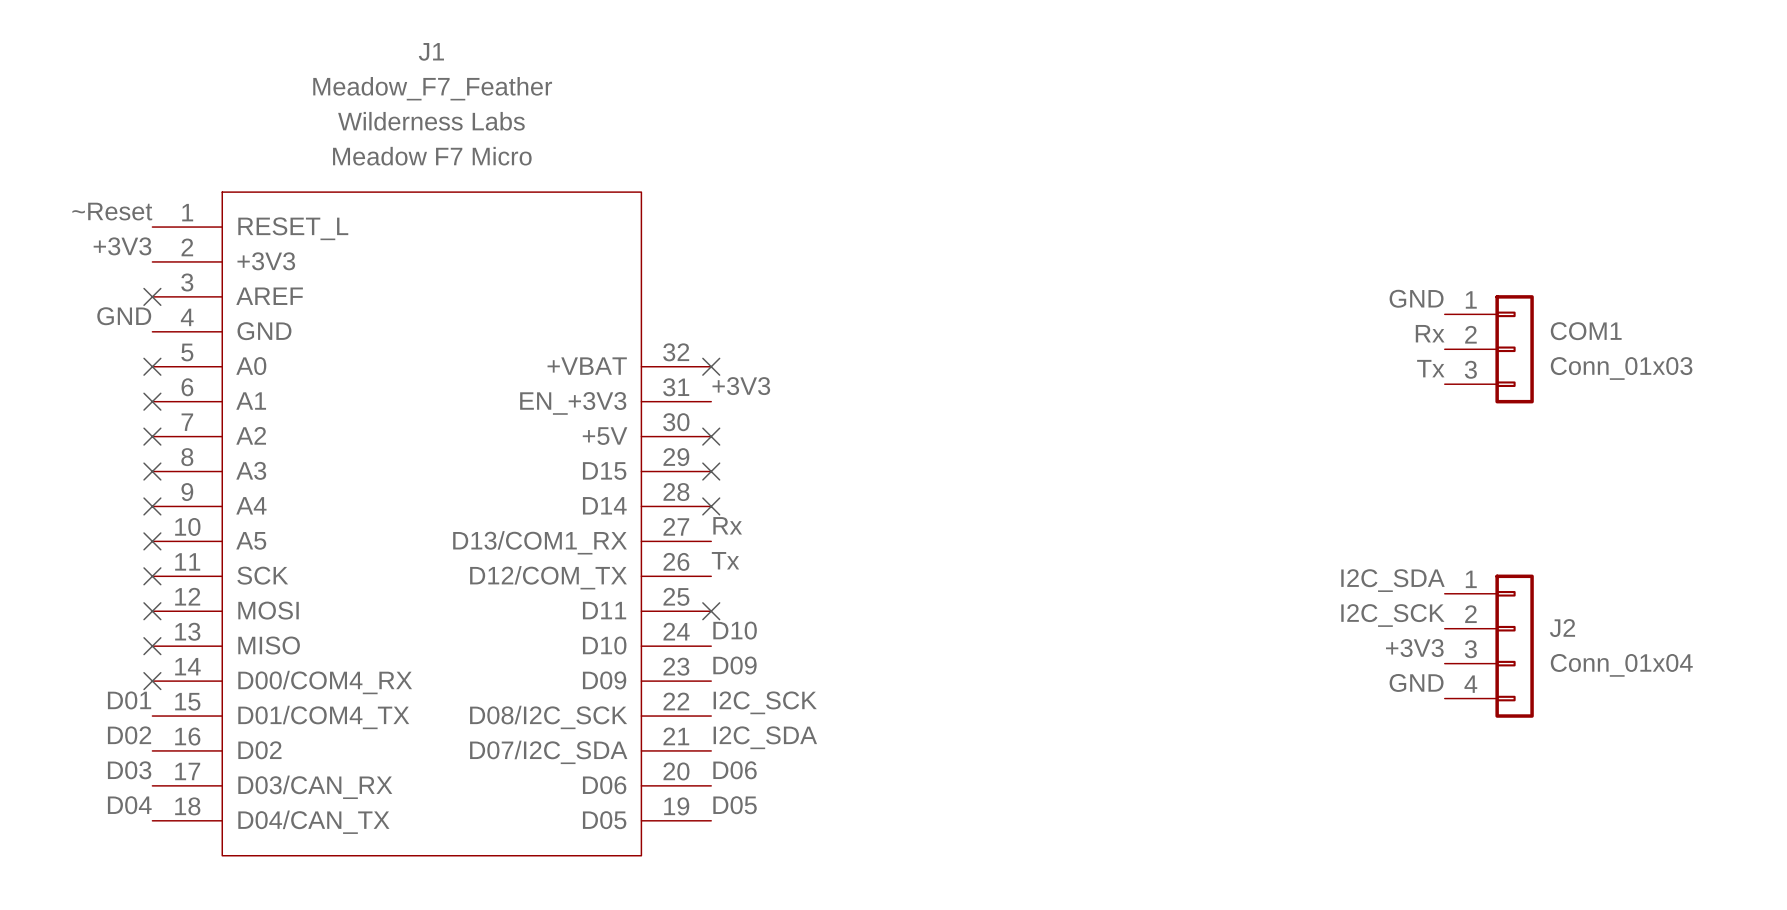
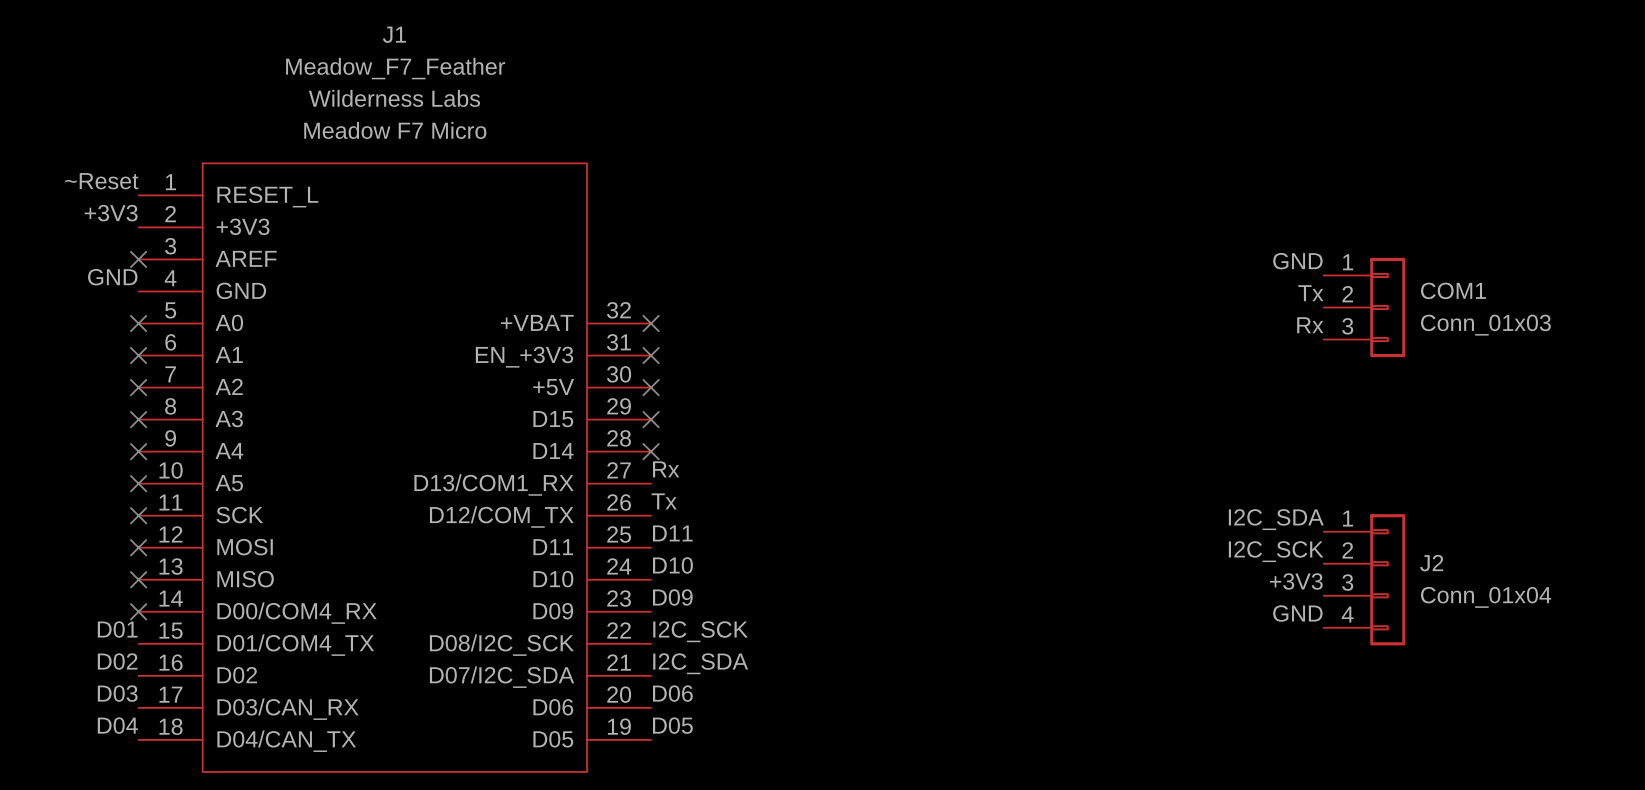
label: Rx (1430, 333) -> Tx (1310, 293)
label: Tx (1430, 368) -> Rx (1310, 325)
label: +3V3 (741, 386) -> none
no-connect mark: none -> (651, 355)
label: none -> D11 (672, 533)
no-connect mark: (711, 611) -> none

